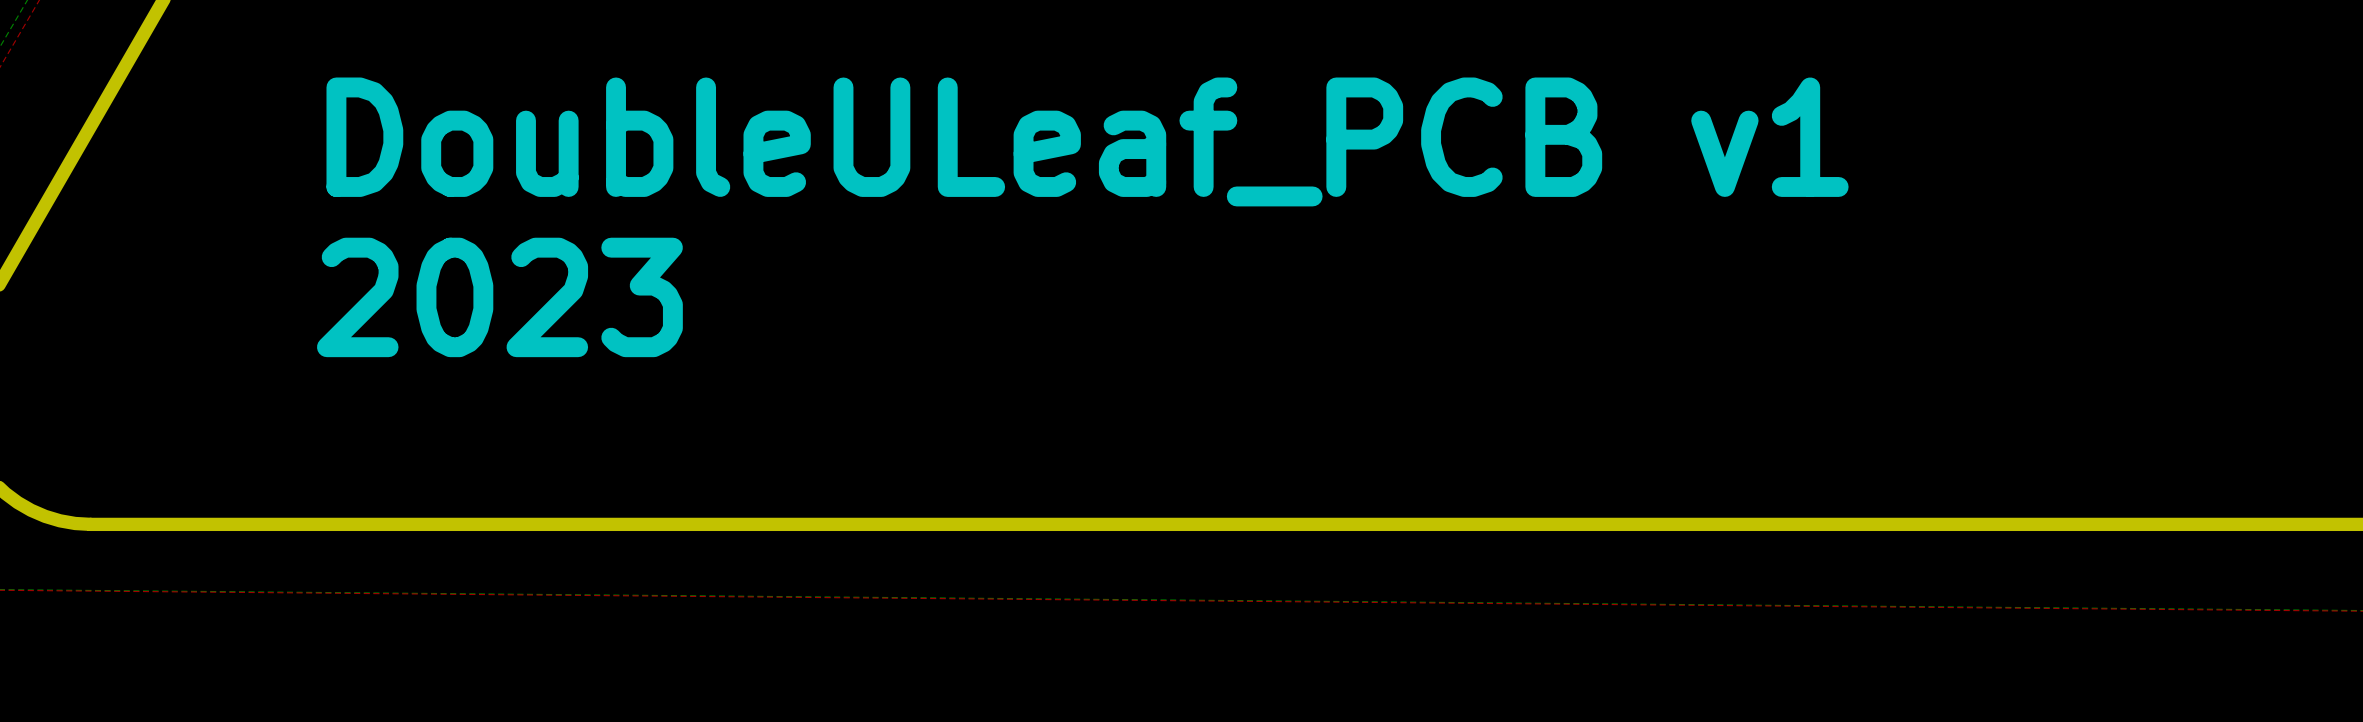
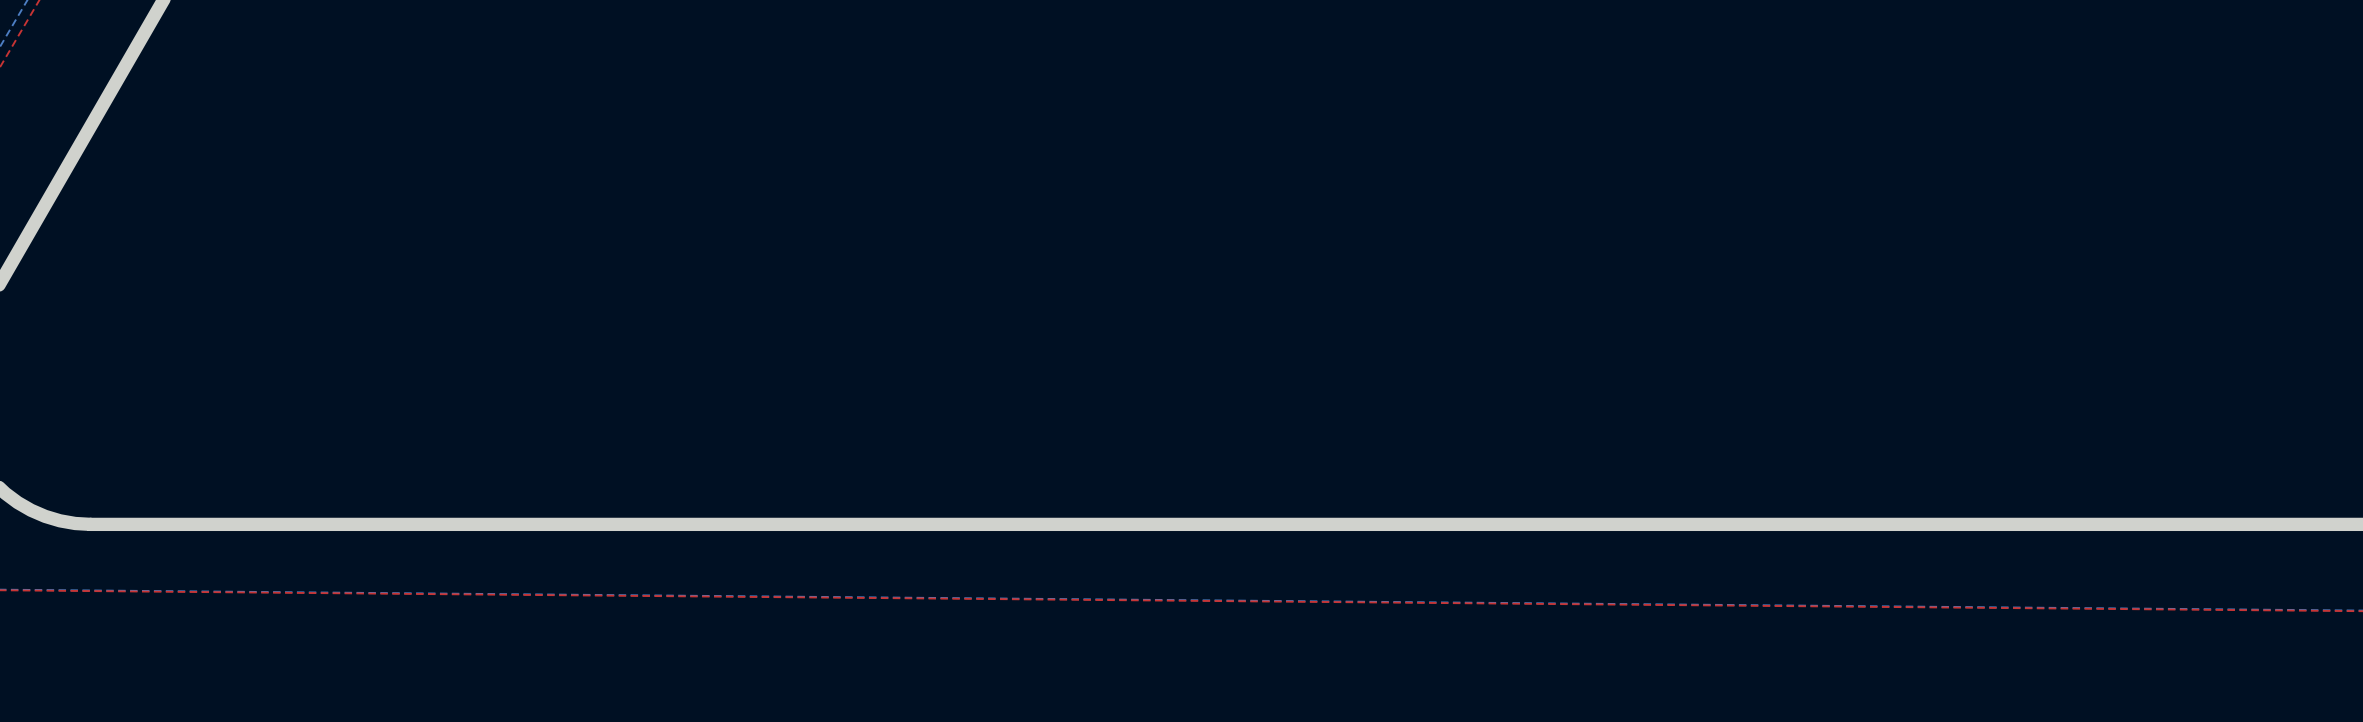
text: DoubleULeaf_PCB v1 (1087, 141) -> none
text: 2023 (499, 297) -> none

